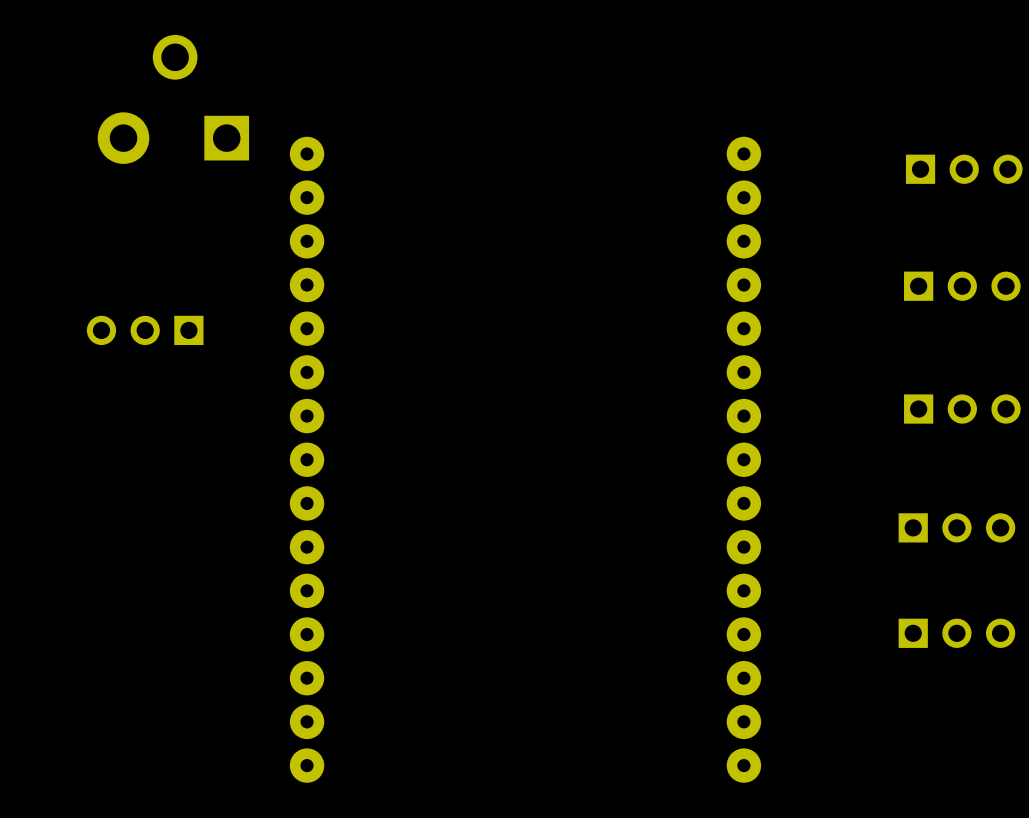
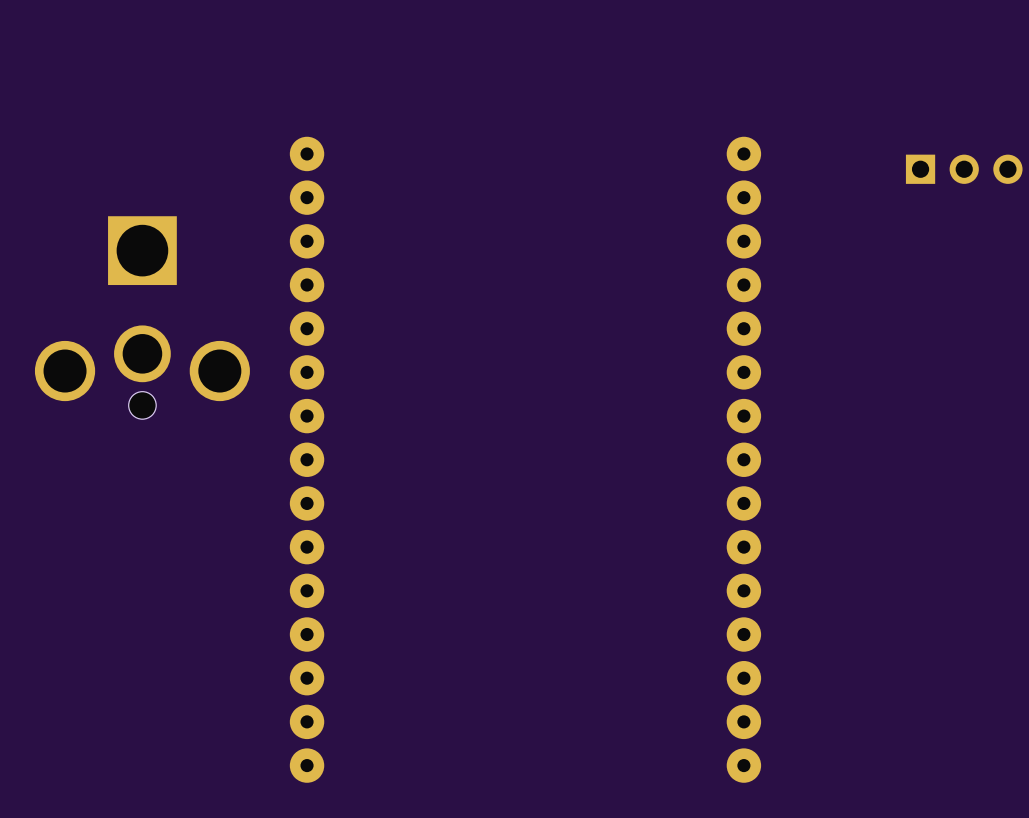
part: (173, 99) -> none
part: (962, 286) -> none
part footprint: [86, 315, 204, 346] -> [34, 216, 250, 420]
part: (962, 409) -> none
part: (956, 527) -> none
part: (956, 633) -> none

